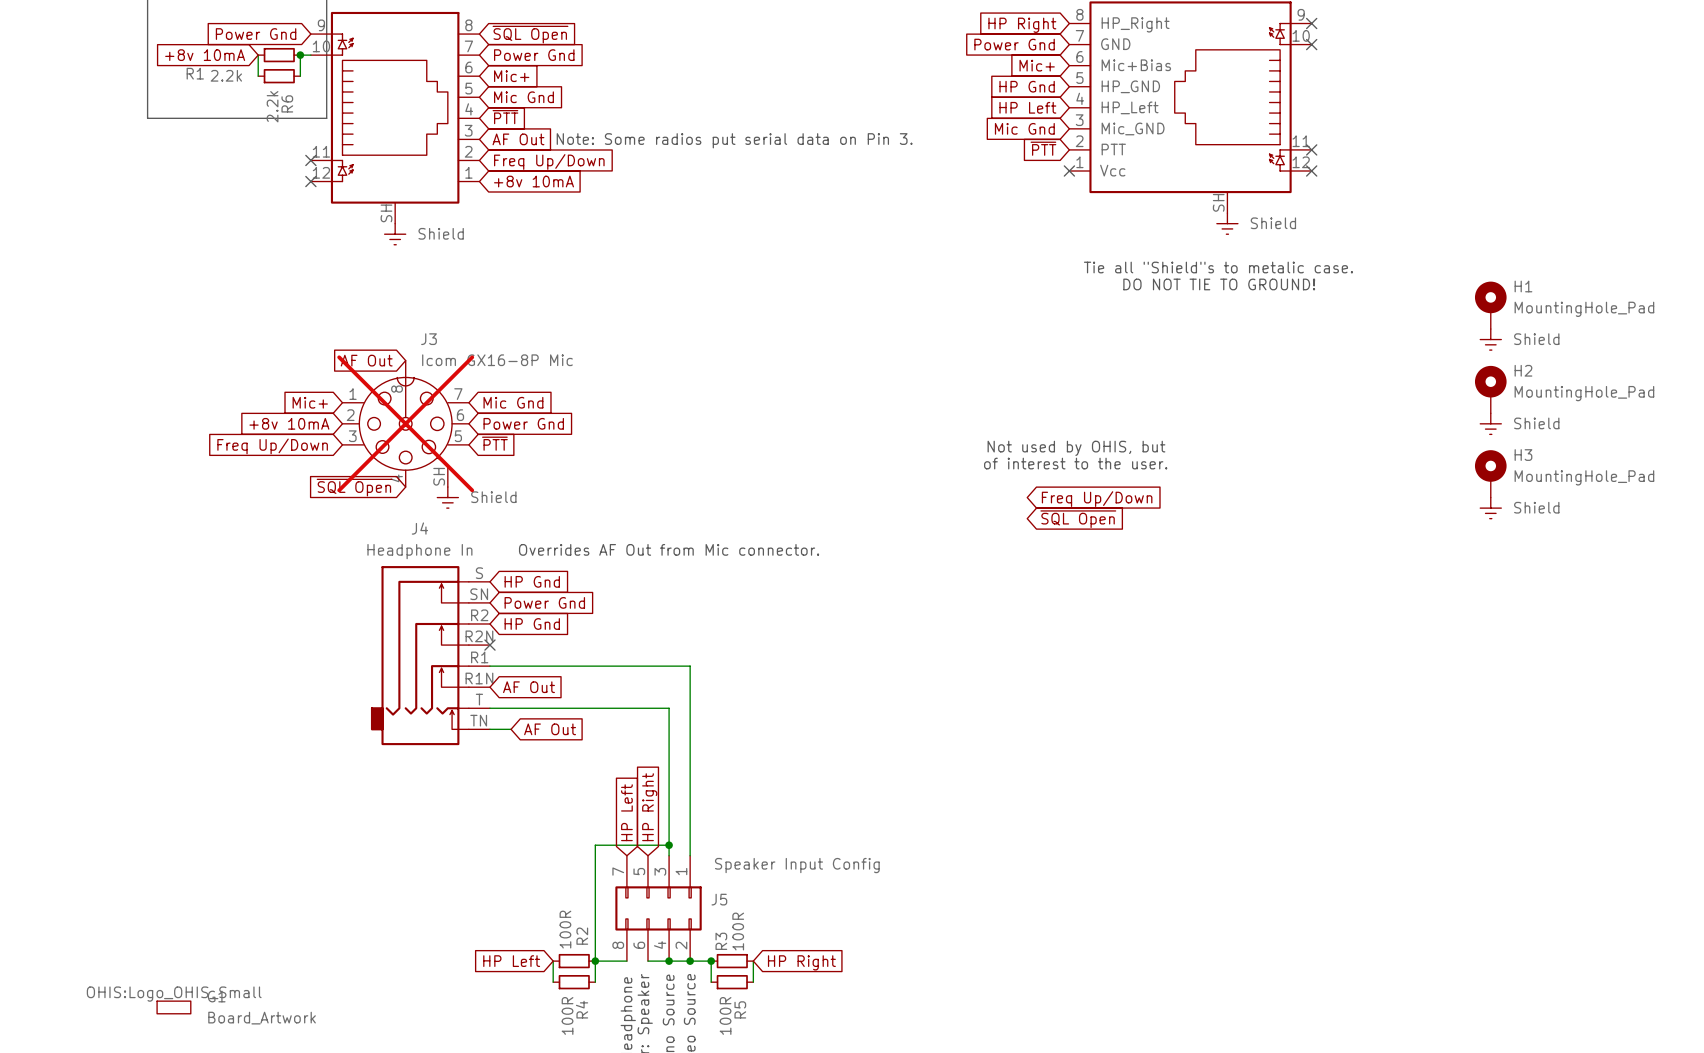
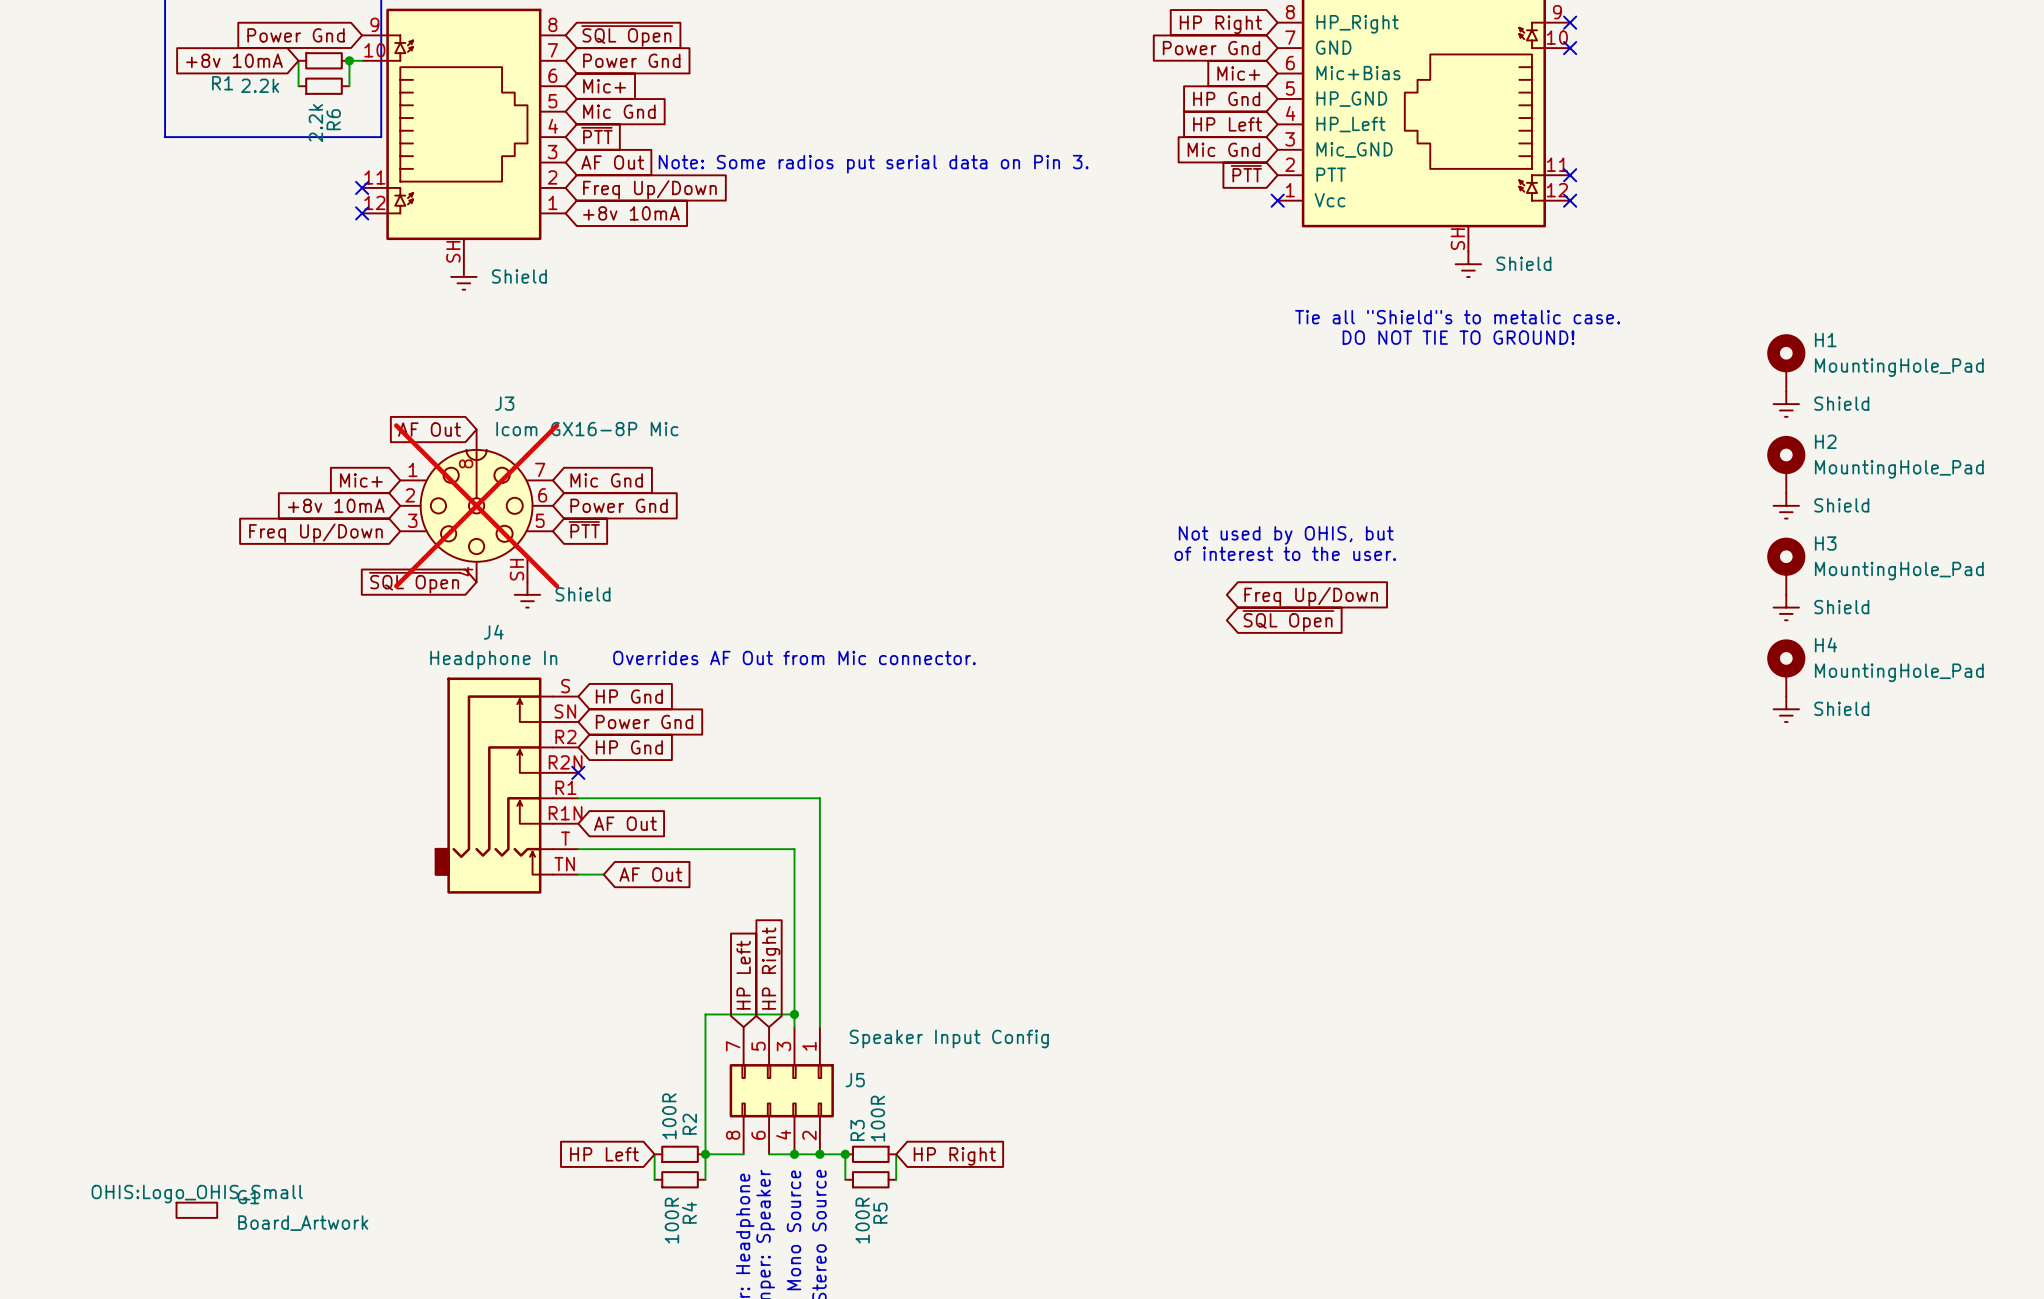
H4: none -> MountingHole_Pad (1786, 667)
power symbol: none -> Shield (1786, 709)

